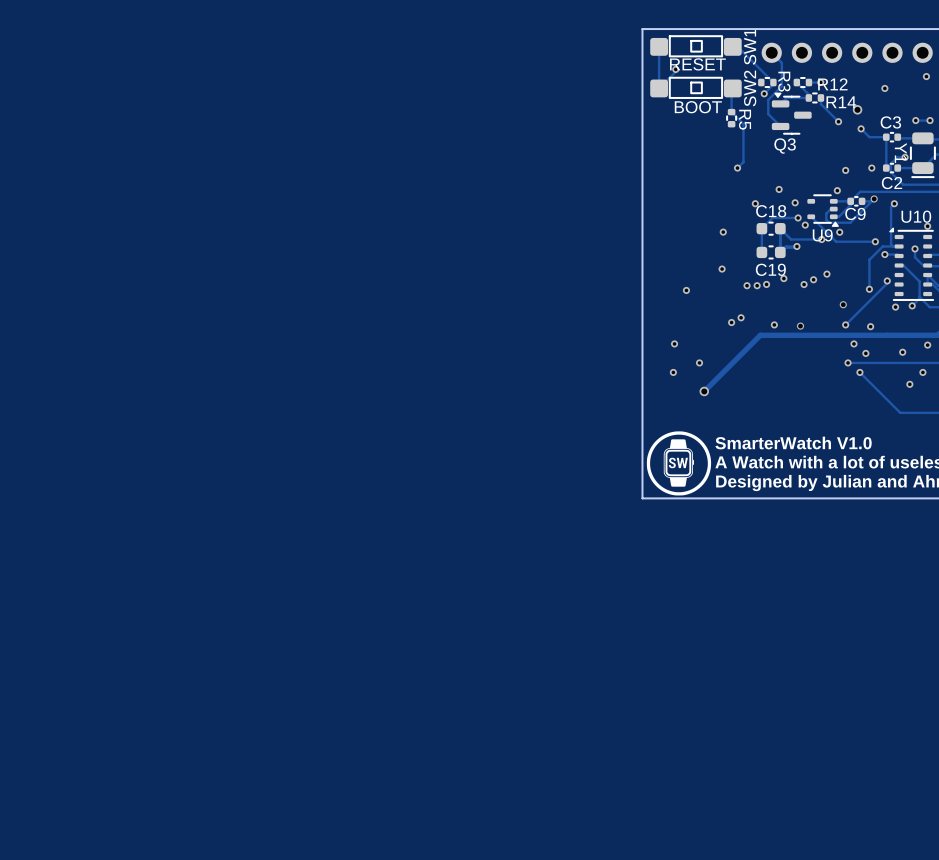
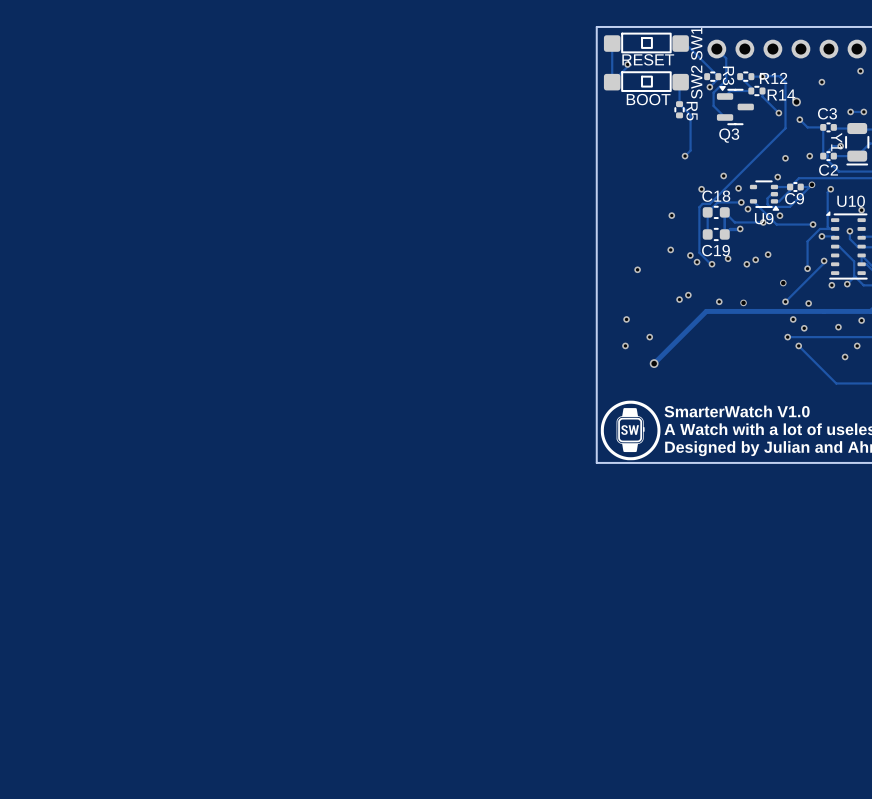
track: none -> (762, 76) (779, 76) (785, 82) (785, 128) (709, 203) (702, 203) (699, 207) (699, 252) (712, 265)
via: none -> (690, 255)
via: none -> (697, 262)
via: (747, 285) -> none
via: (757, 285) -> none

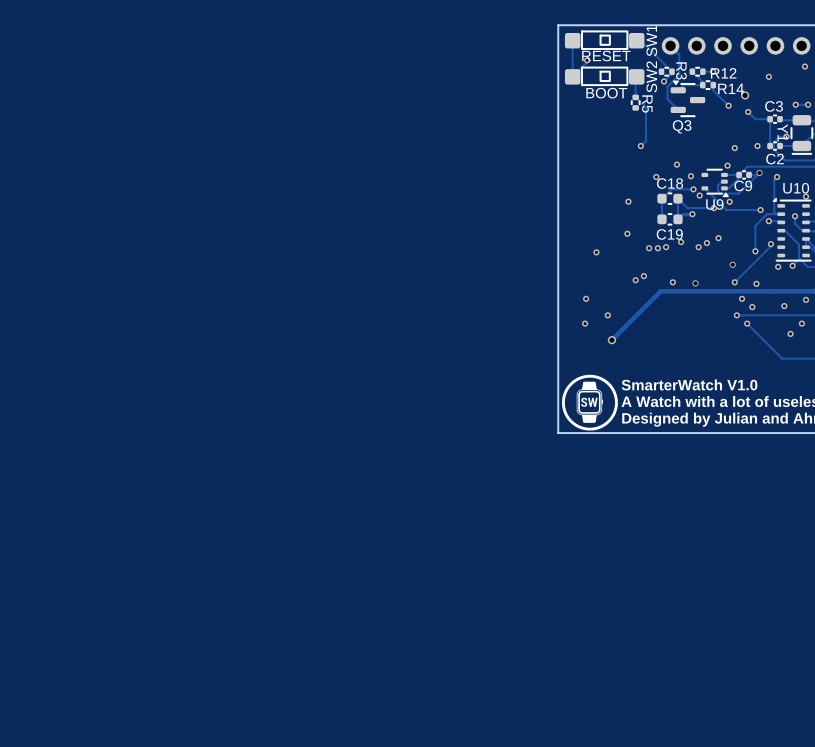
track: (762, 76) (779, 76) (785, 82) (785, 128) (709, 203) (702, 203) (699, 207) (699, 252) (712, 265) -> none
via: (690, 255) -> none
via: (697, 262) -> none
via: none -> (649, 248)
via: none -> (657, 248)

